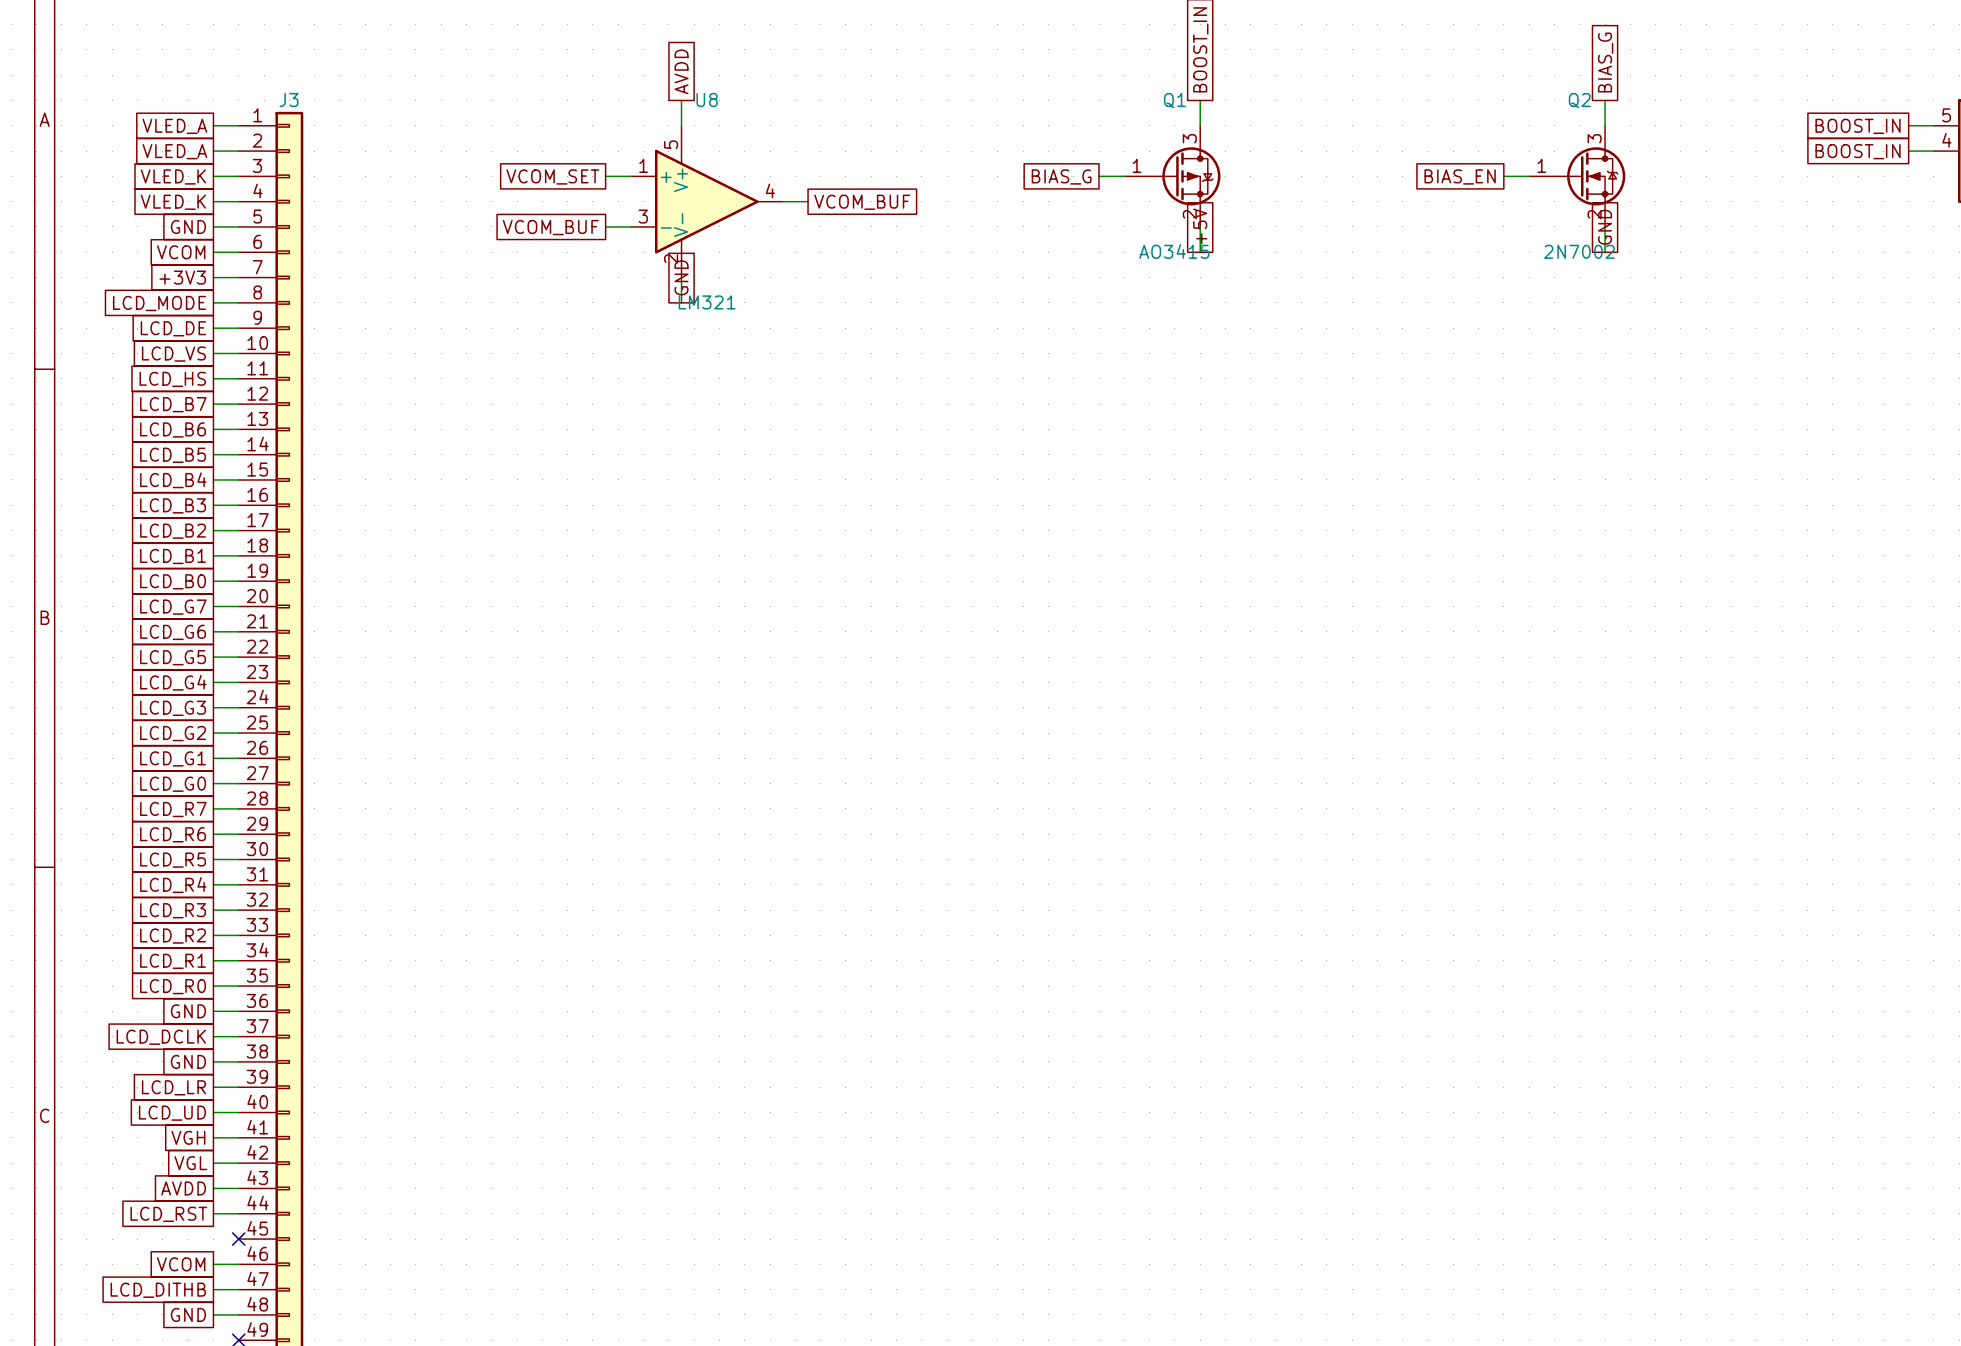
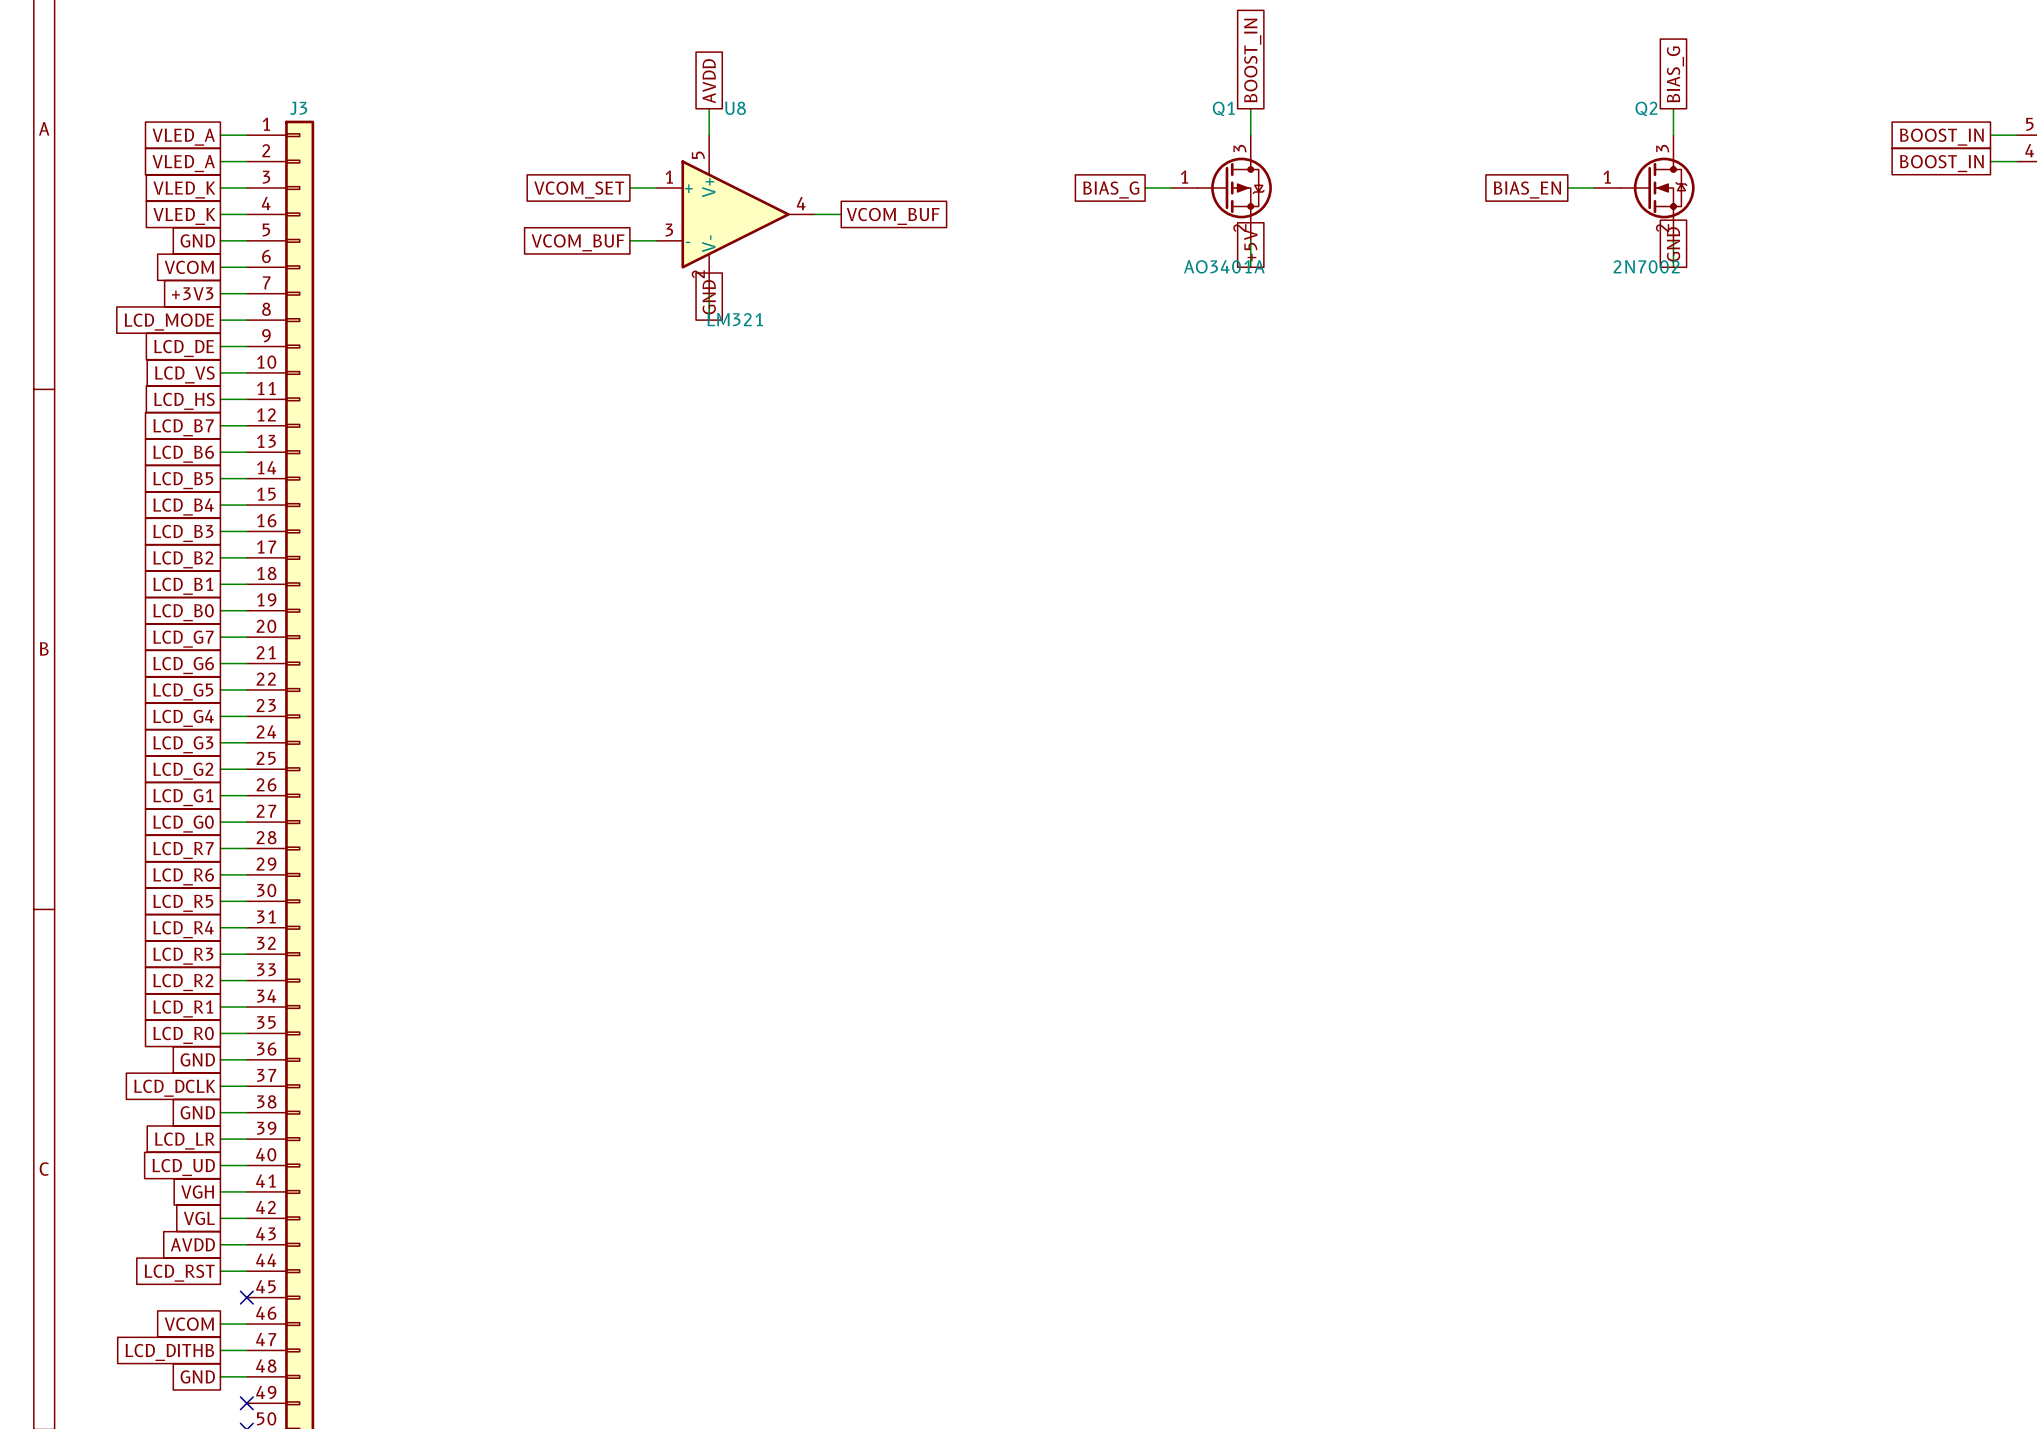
Q1 value: AO3415 (1174, 251) -> AO3401A (1224, 266)

